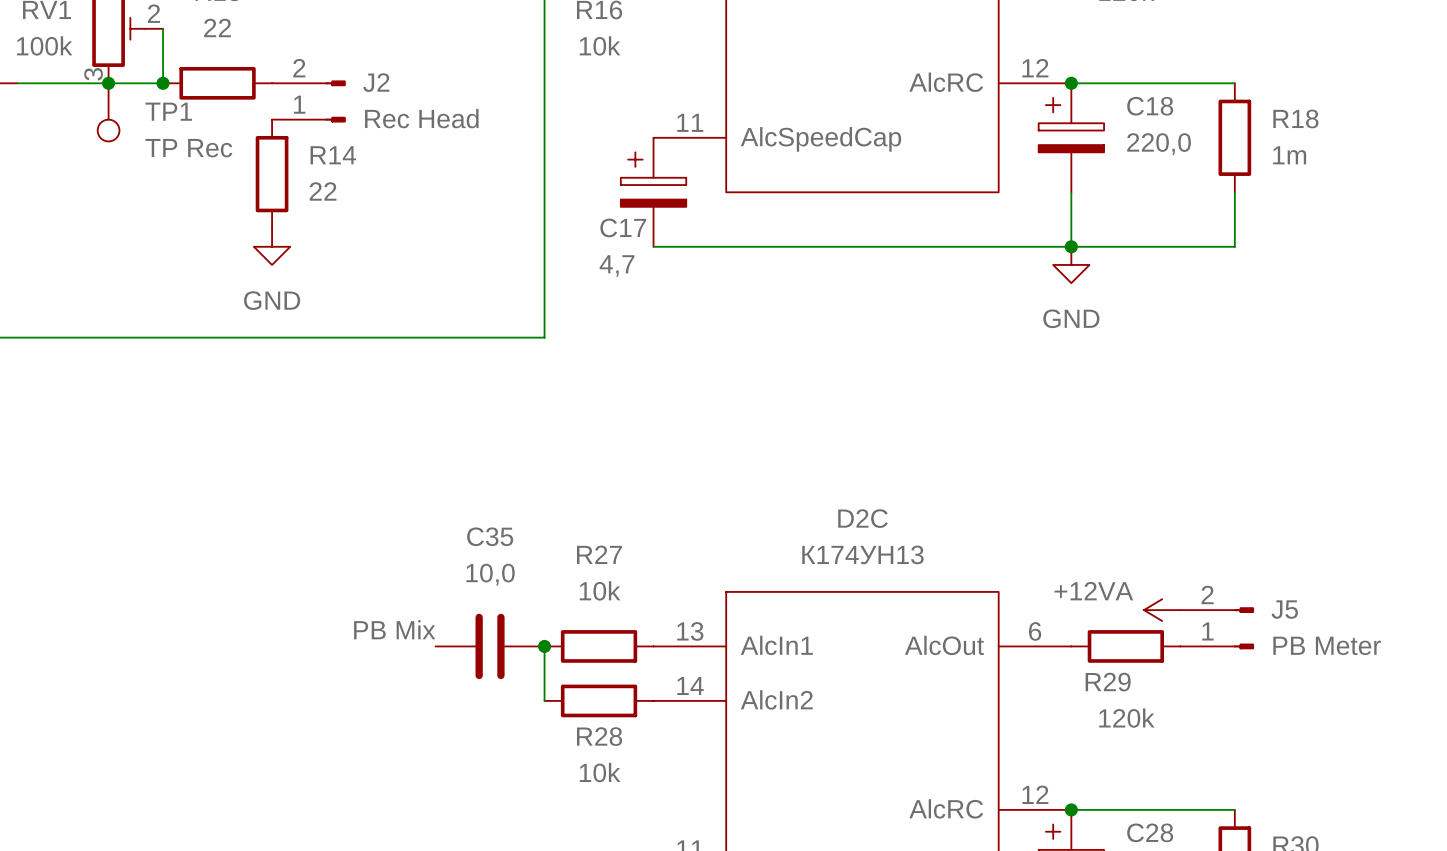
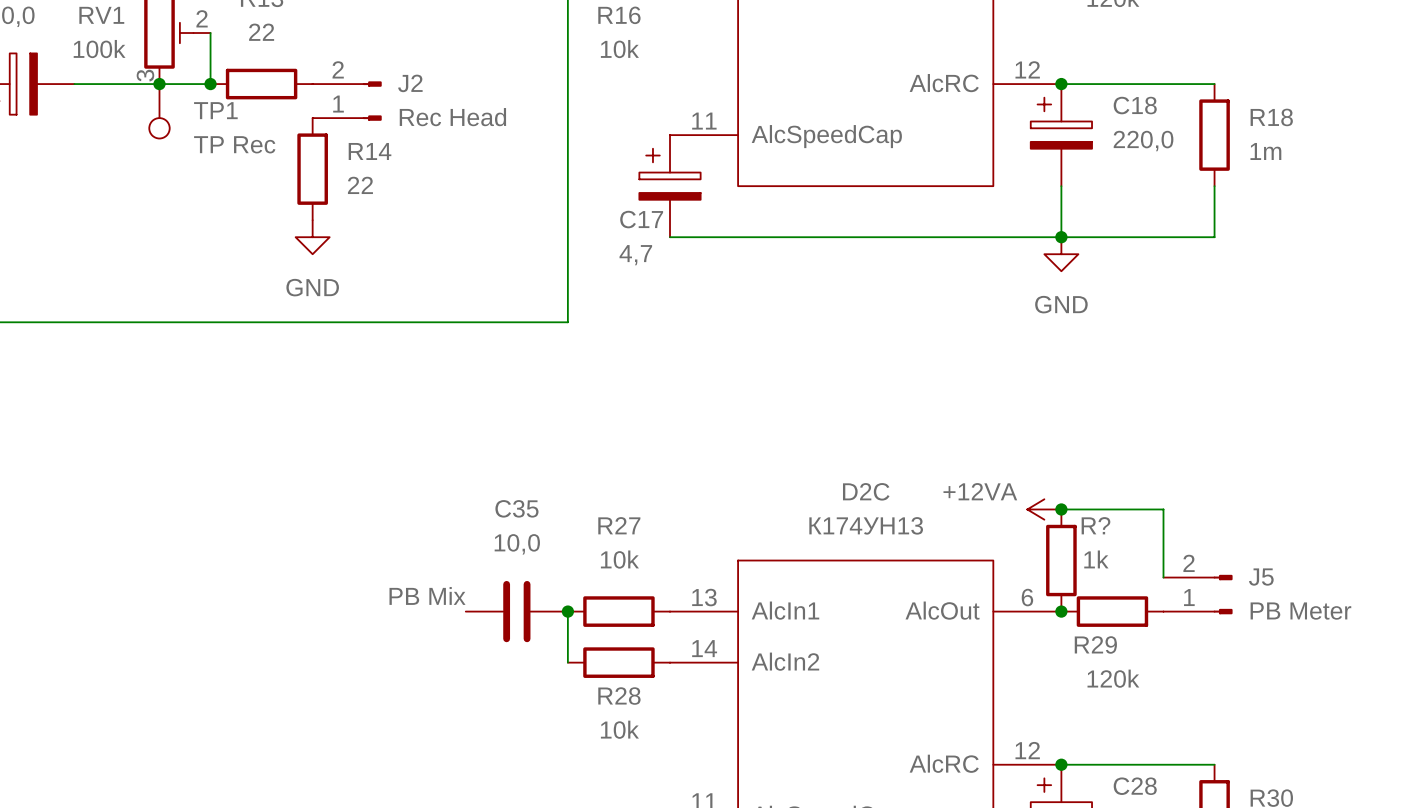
wire: none -> (1061, 509) (1163, 509) (1163, 577)
junction: none -> (1061, 509)
R?: none -> 1k (1061, 560)
power symbol position: +12VA (1162, 610) -> +12VA (1044, 509)
junction: none -> (1061, 611)

